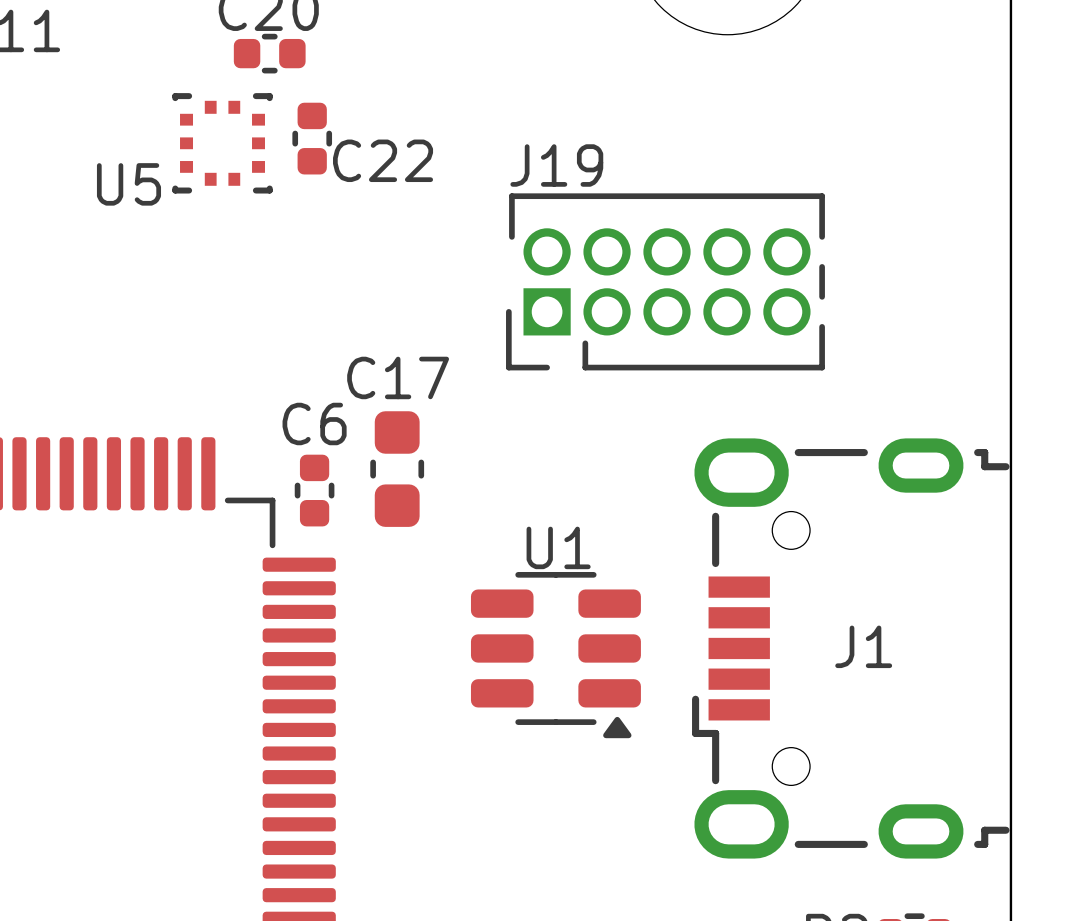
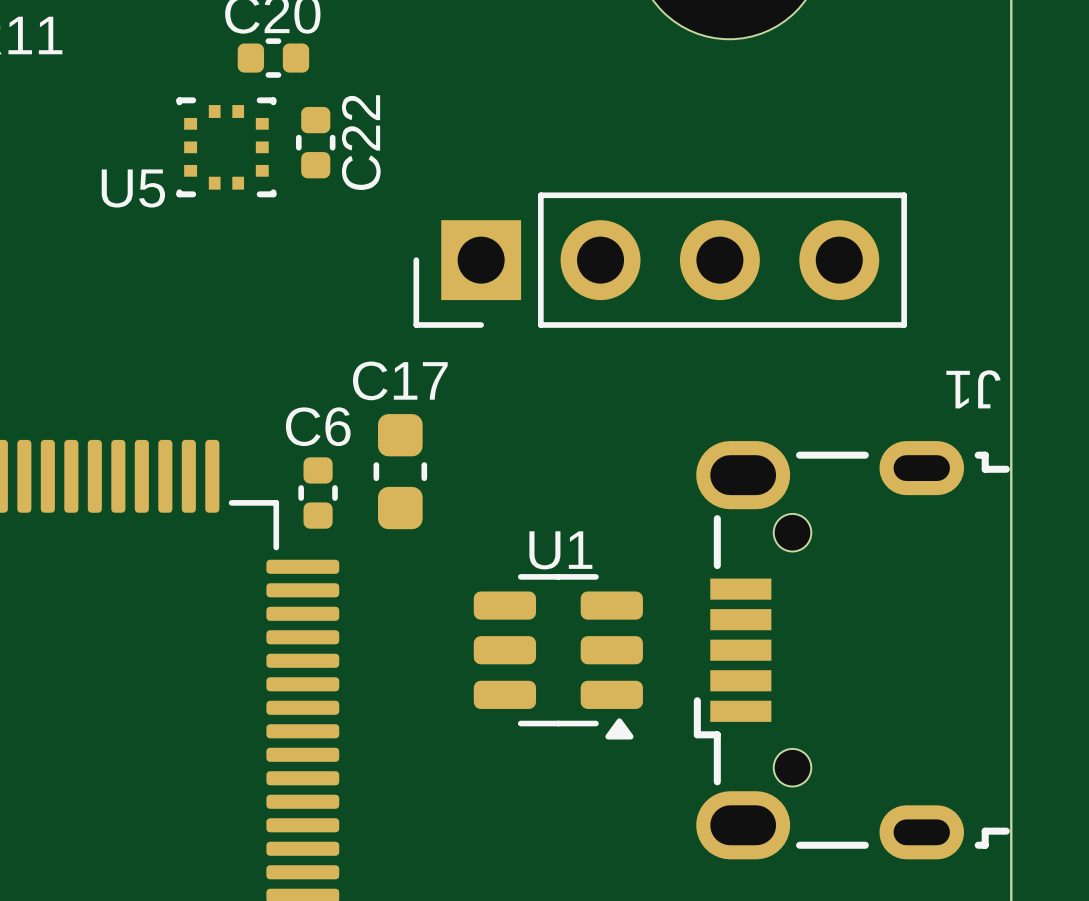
C22 name rotation: 0° (383, 160) -> 90° counterclockwise (361, 142)
part: none -> (660, 260)
J19: (665, 281) -> none
J1 name rotation: 0° (863, 646) -> 180° (973, 389)
J1 name position: J1 (863, 646) -> J1 (973, 389)

